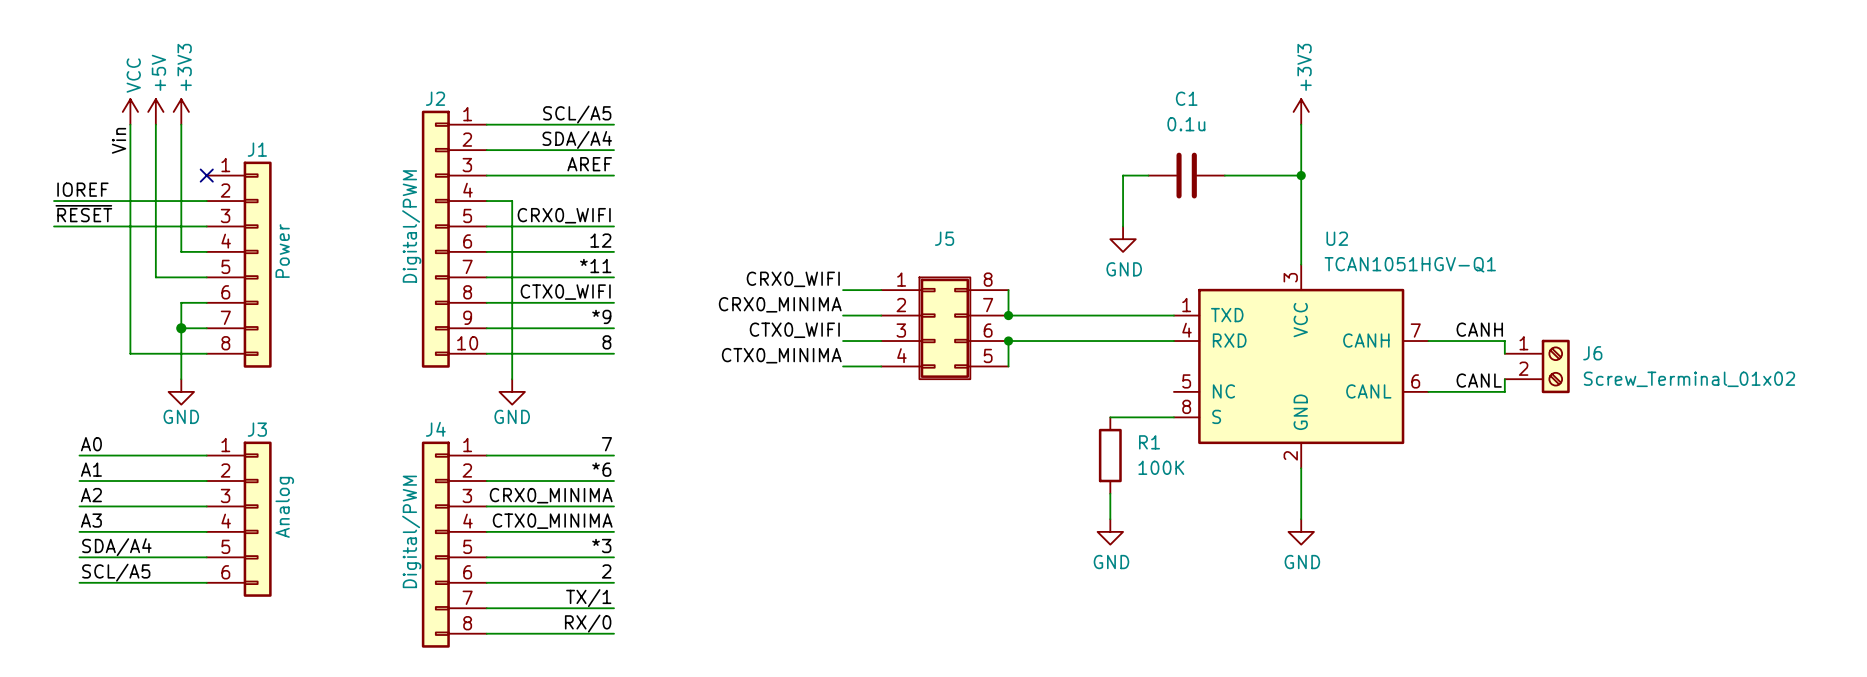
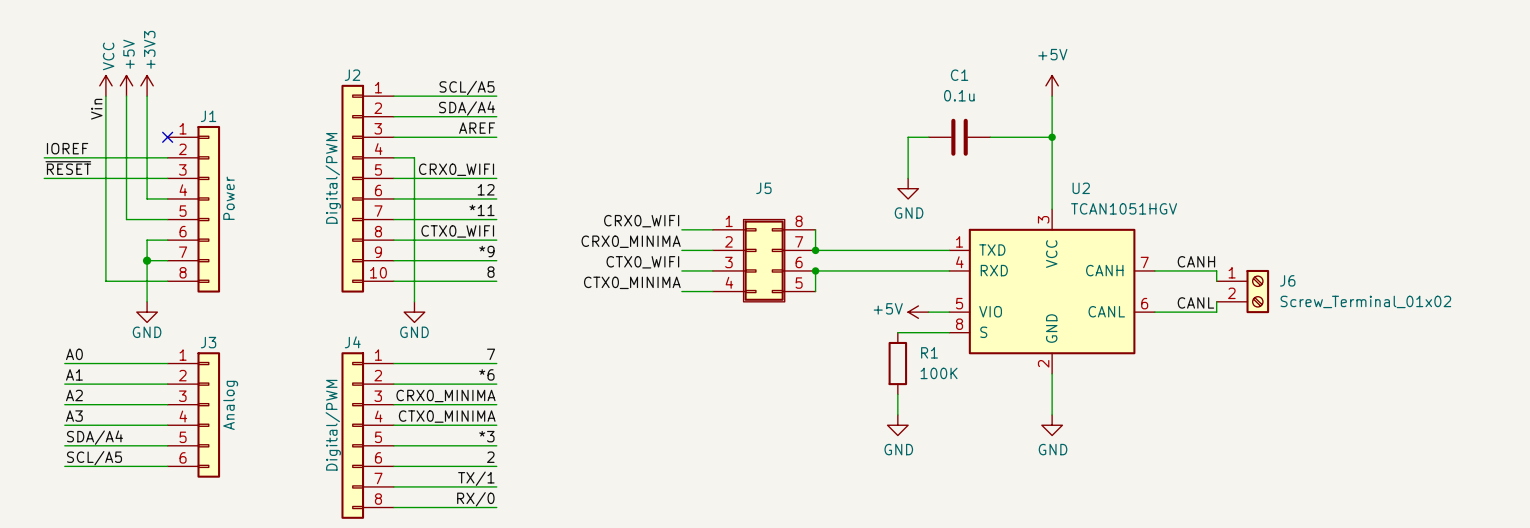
power symbol: +3V3 (1301, 111) -> +5V (1052, 85)
U2 value: TCAN1051HGV-Q1 (1410, 264) -> TCAN1051HGV (1124, 208)
power symbol: none -> +5V (918, 312)
wire: none -> (928, 312) (949, 312)
U2 pin name: NC (1223, 391) -> VIO (990, 311)

